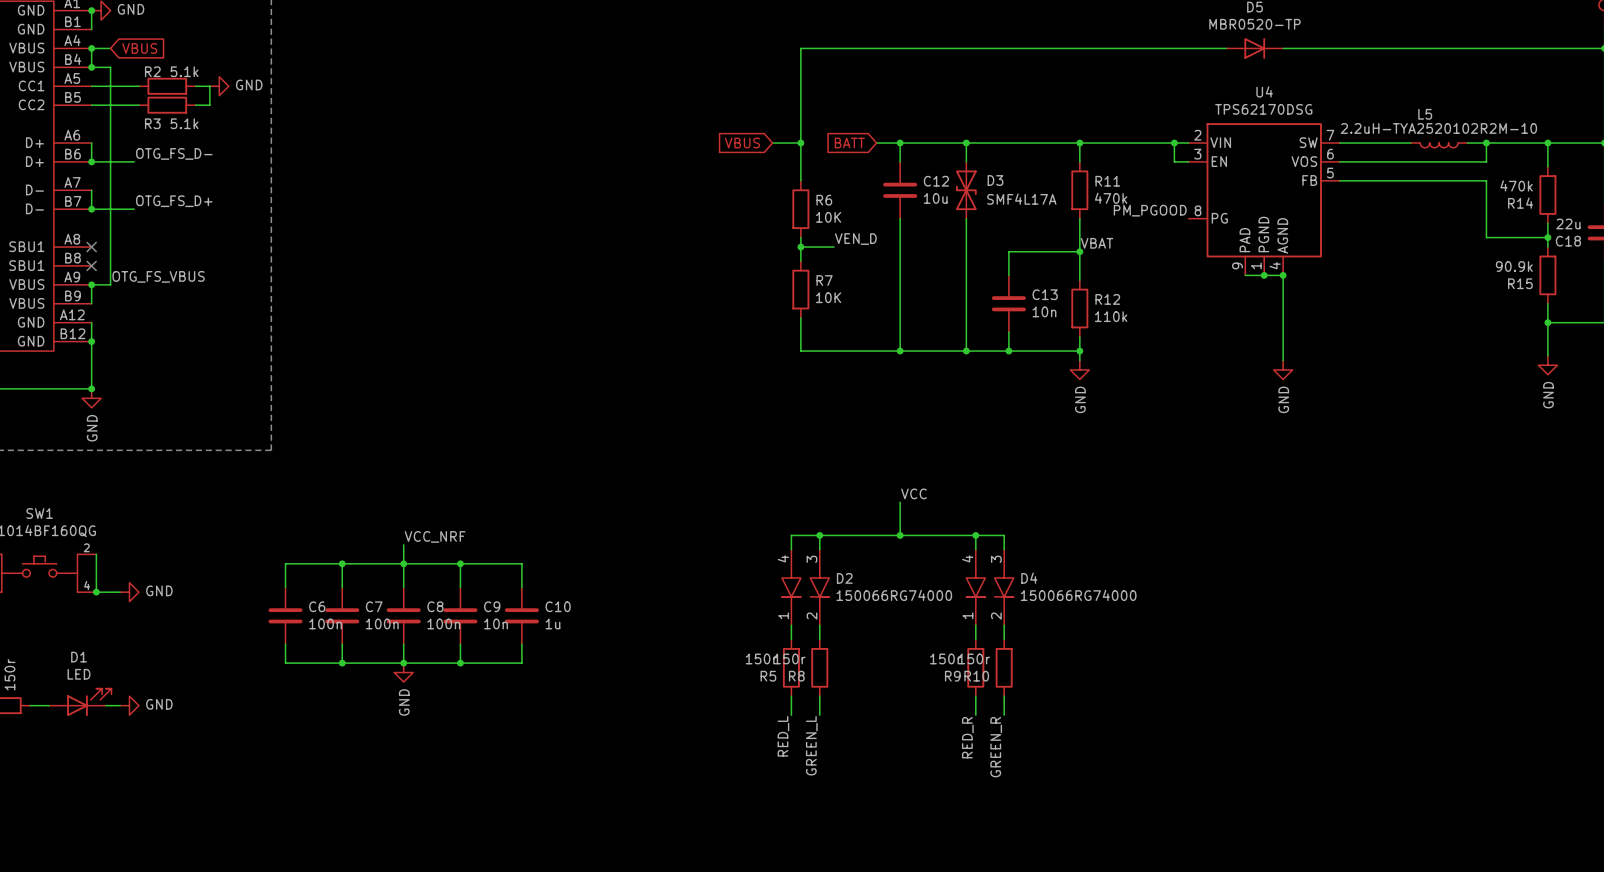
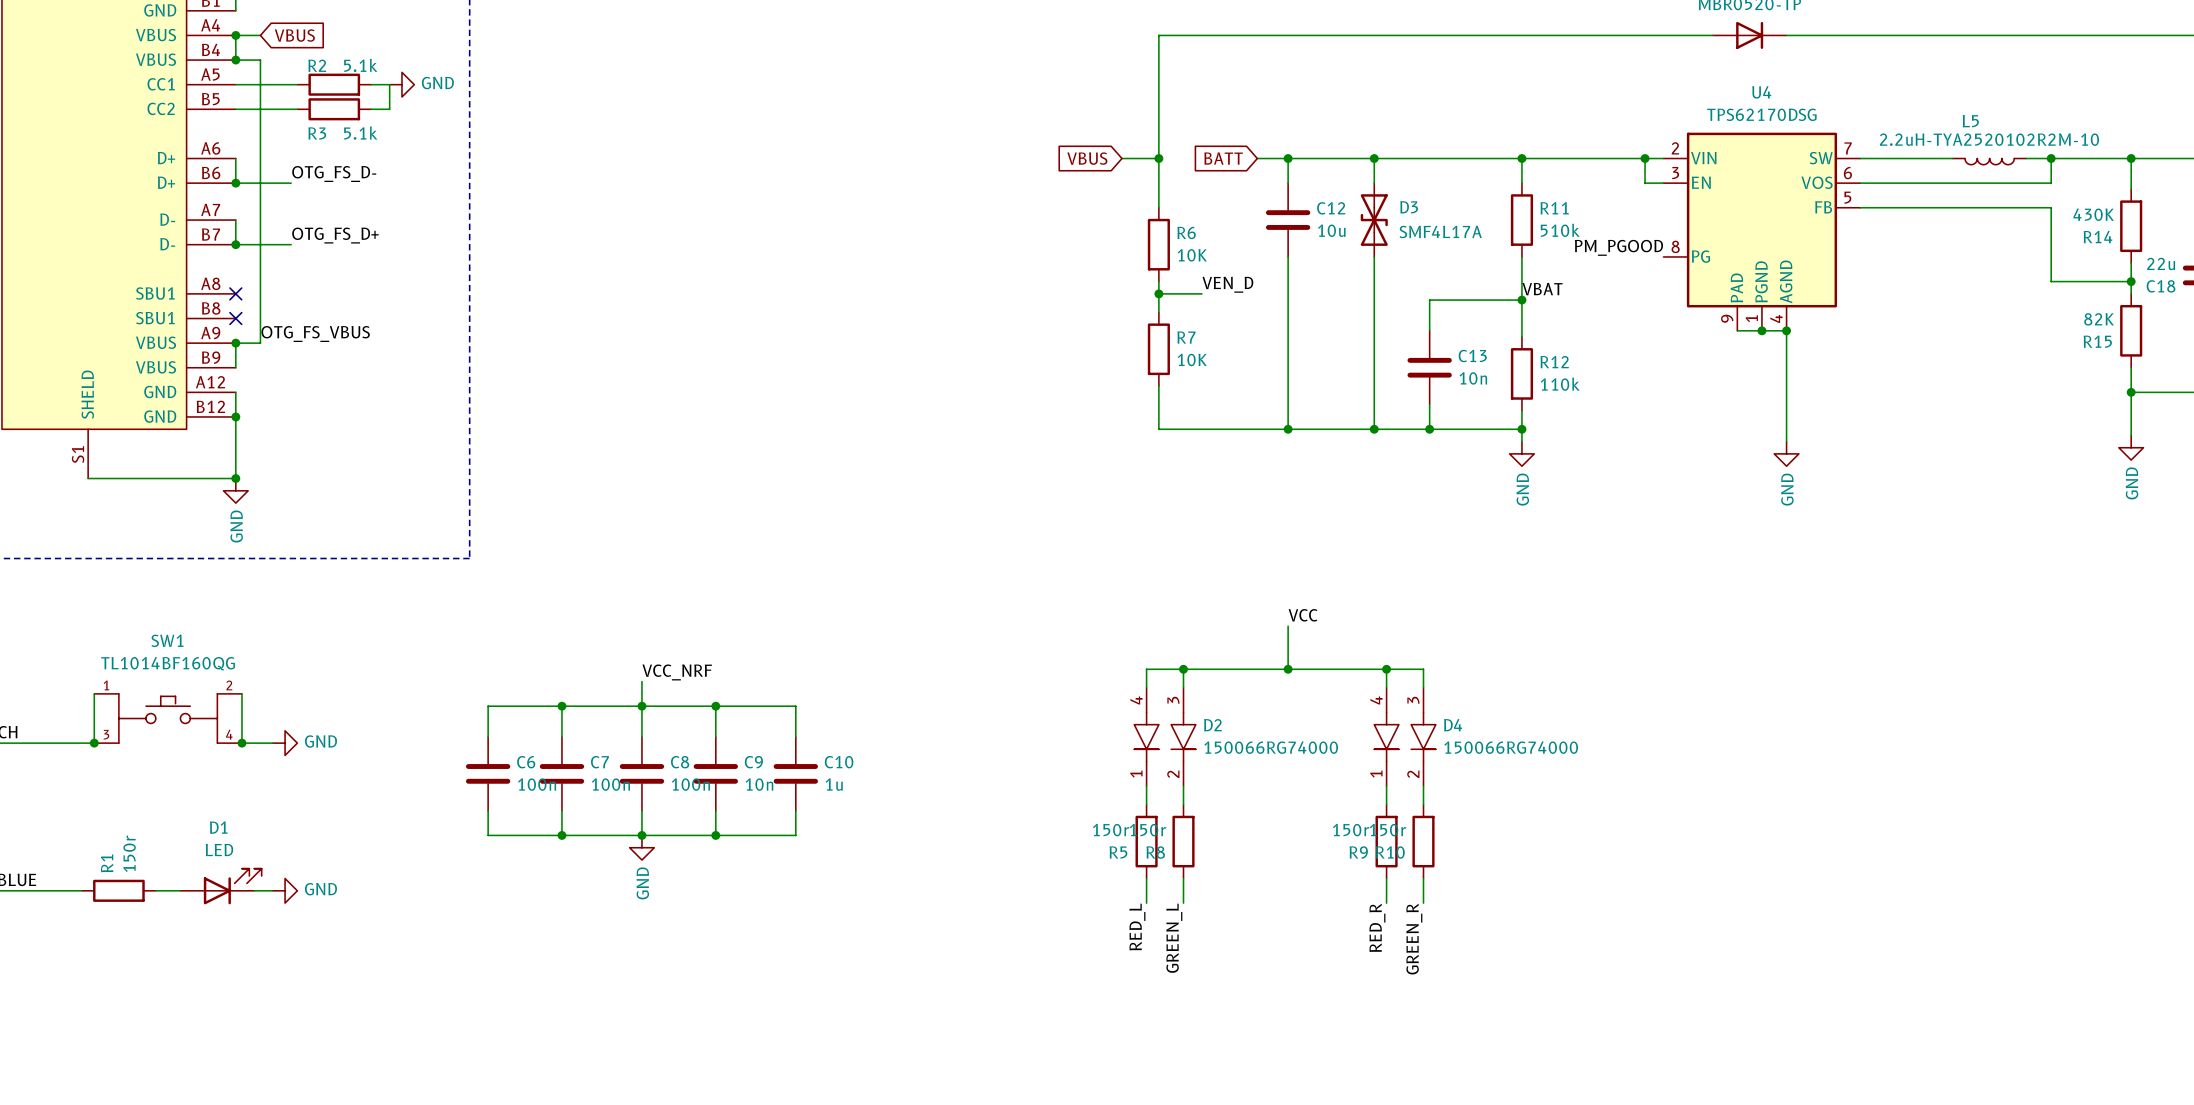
R14 value: 470k (1516, 185) -> 430K (2093, 214)
R11 value: 470k (1111, 198) -> 510k (1560, 230)
R15 value: 90.9k (1514, 266) -> 82K (2099, 319)

